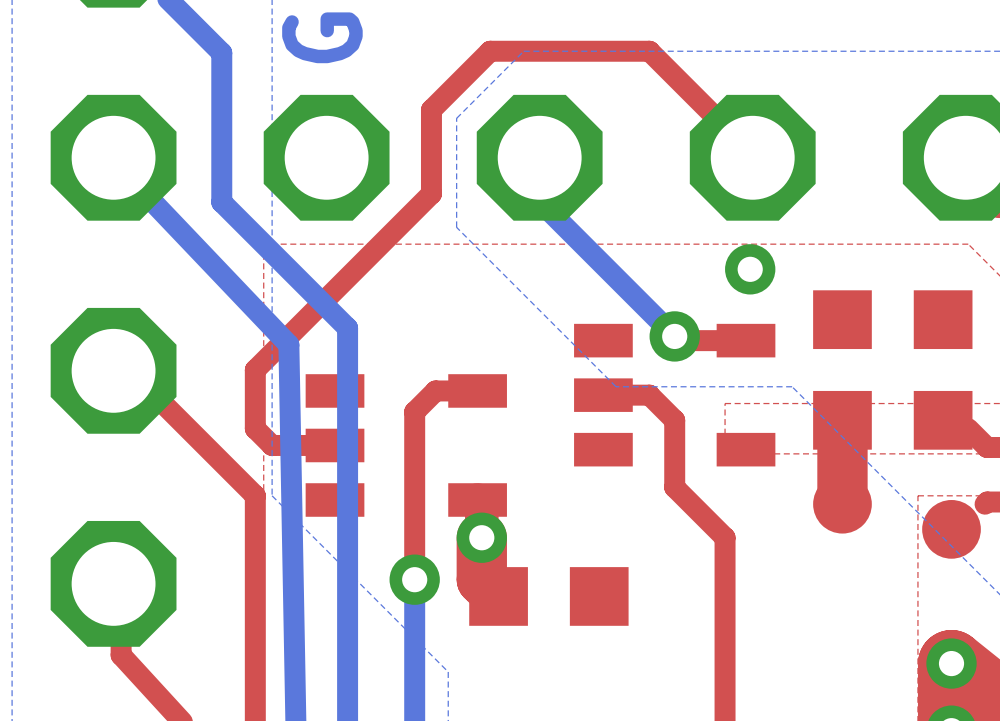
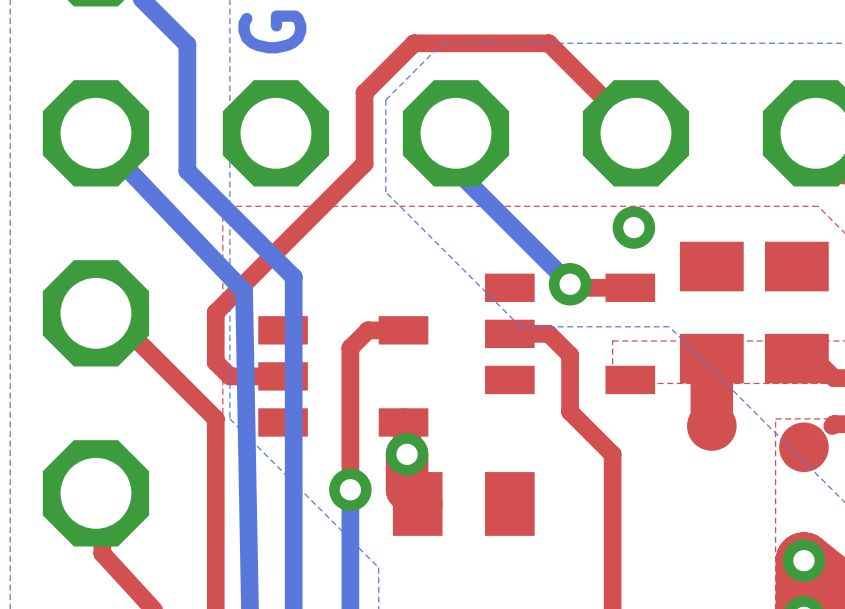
part footprint: [813, 290, 872, 450] -> [679, 241, 744, 384]
part footprint: [913, 290, 973, 450] -> [764, 241, 829, 384]
part footprint: [469, 567, 629, 626] -> [392, 472, 535, 536]

